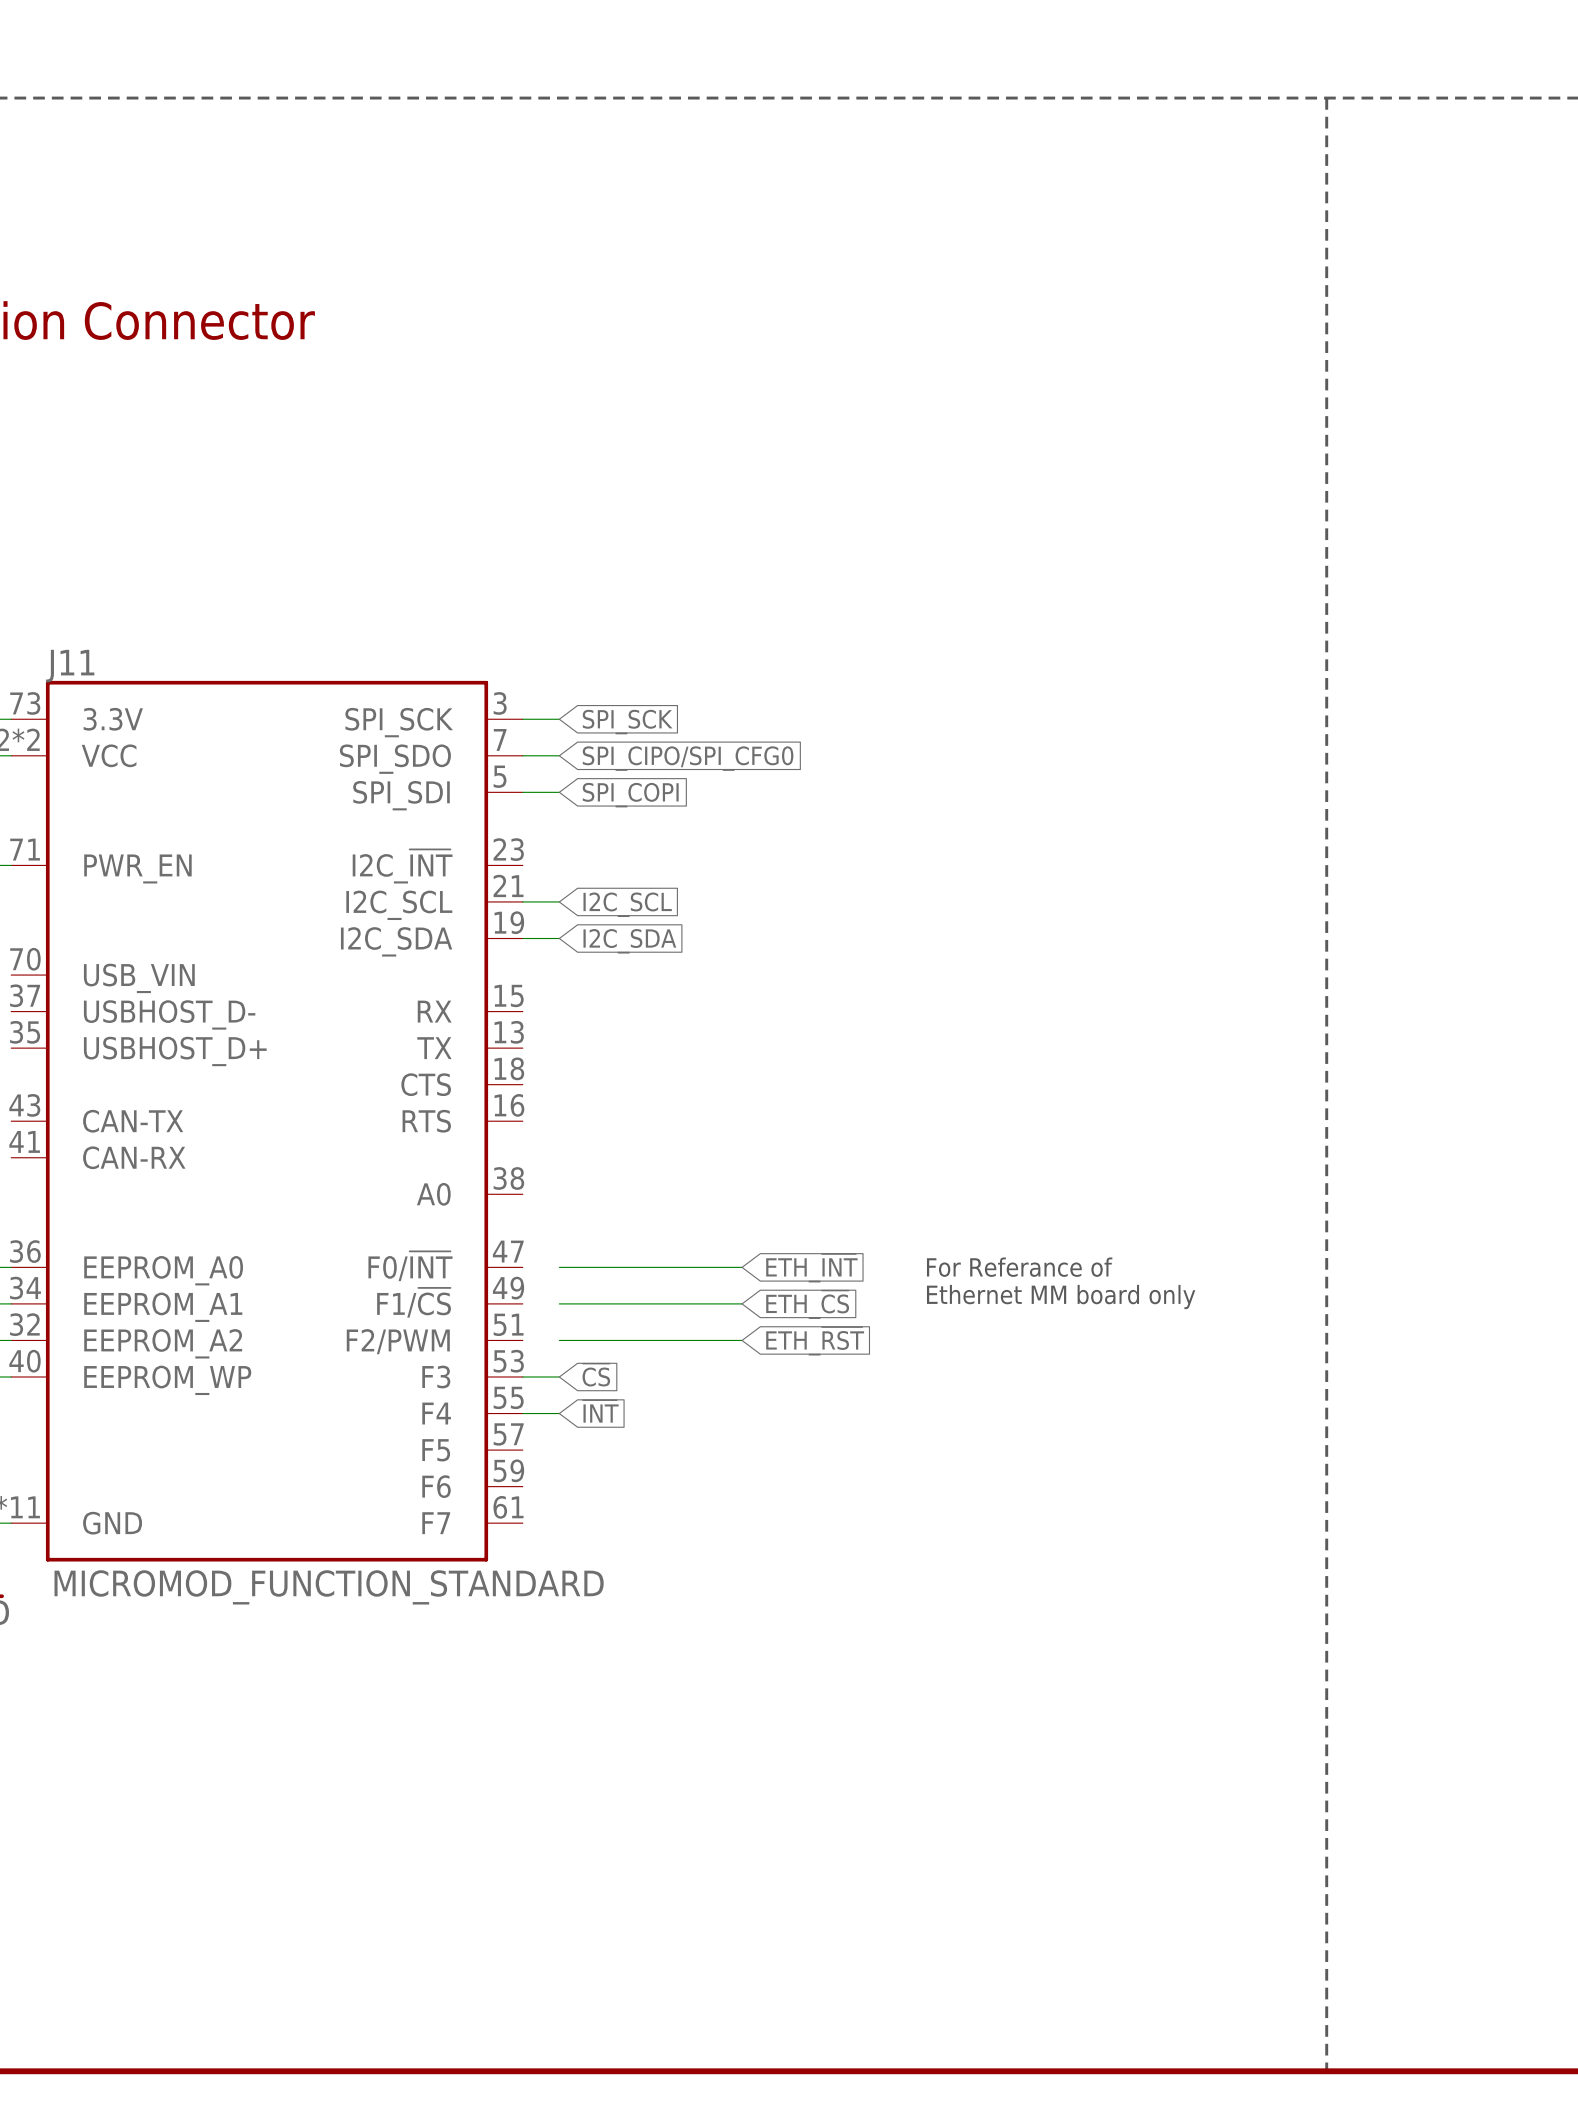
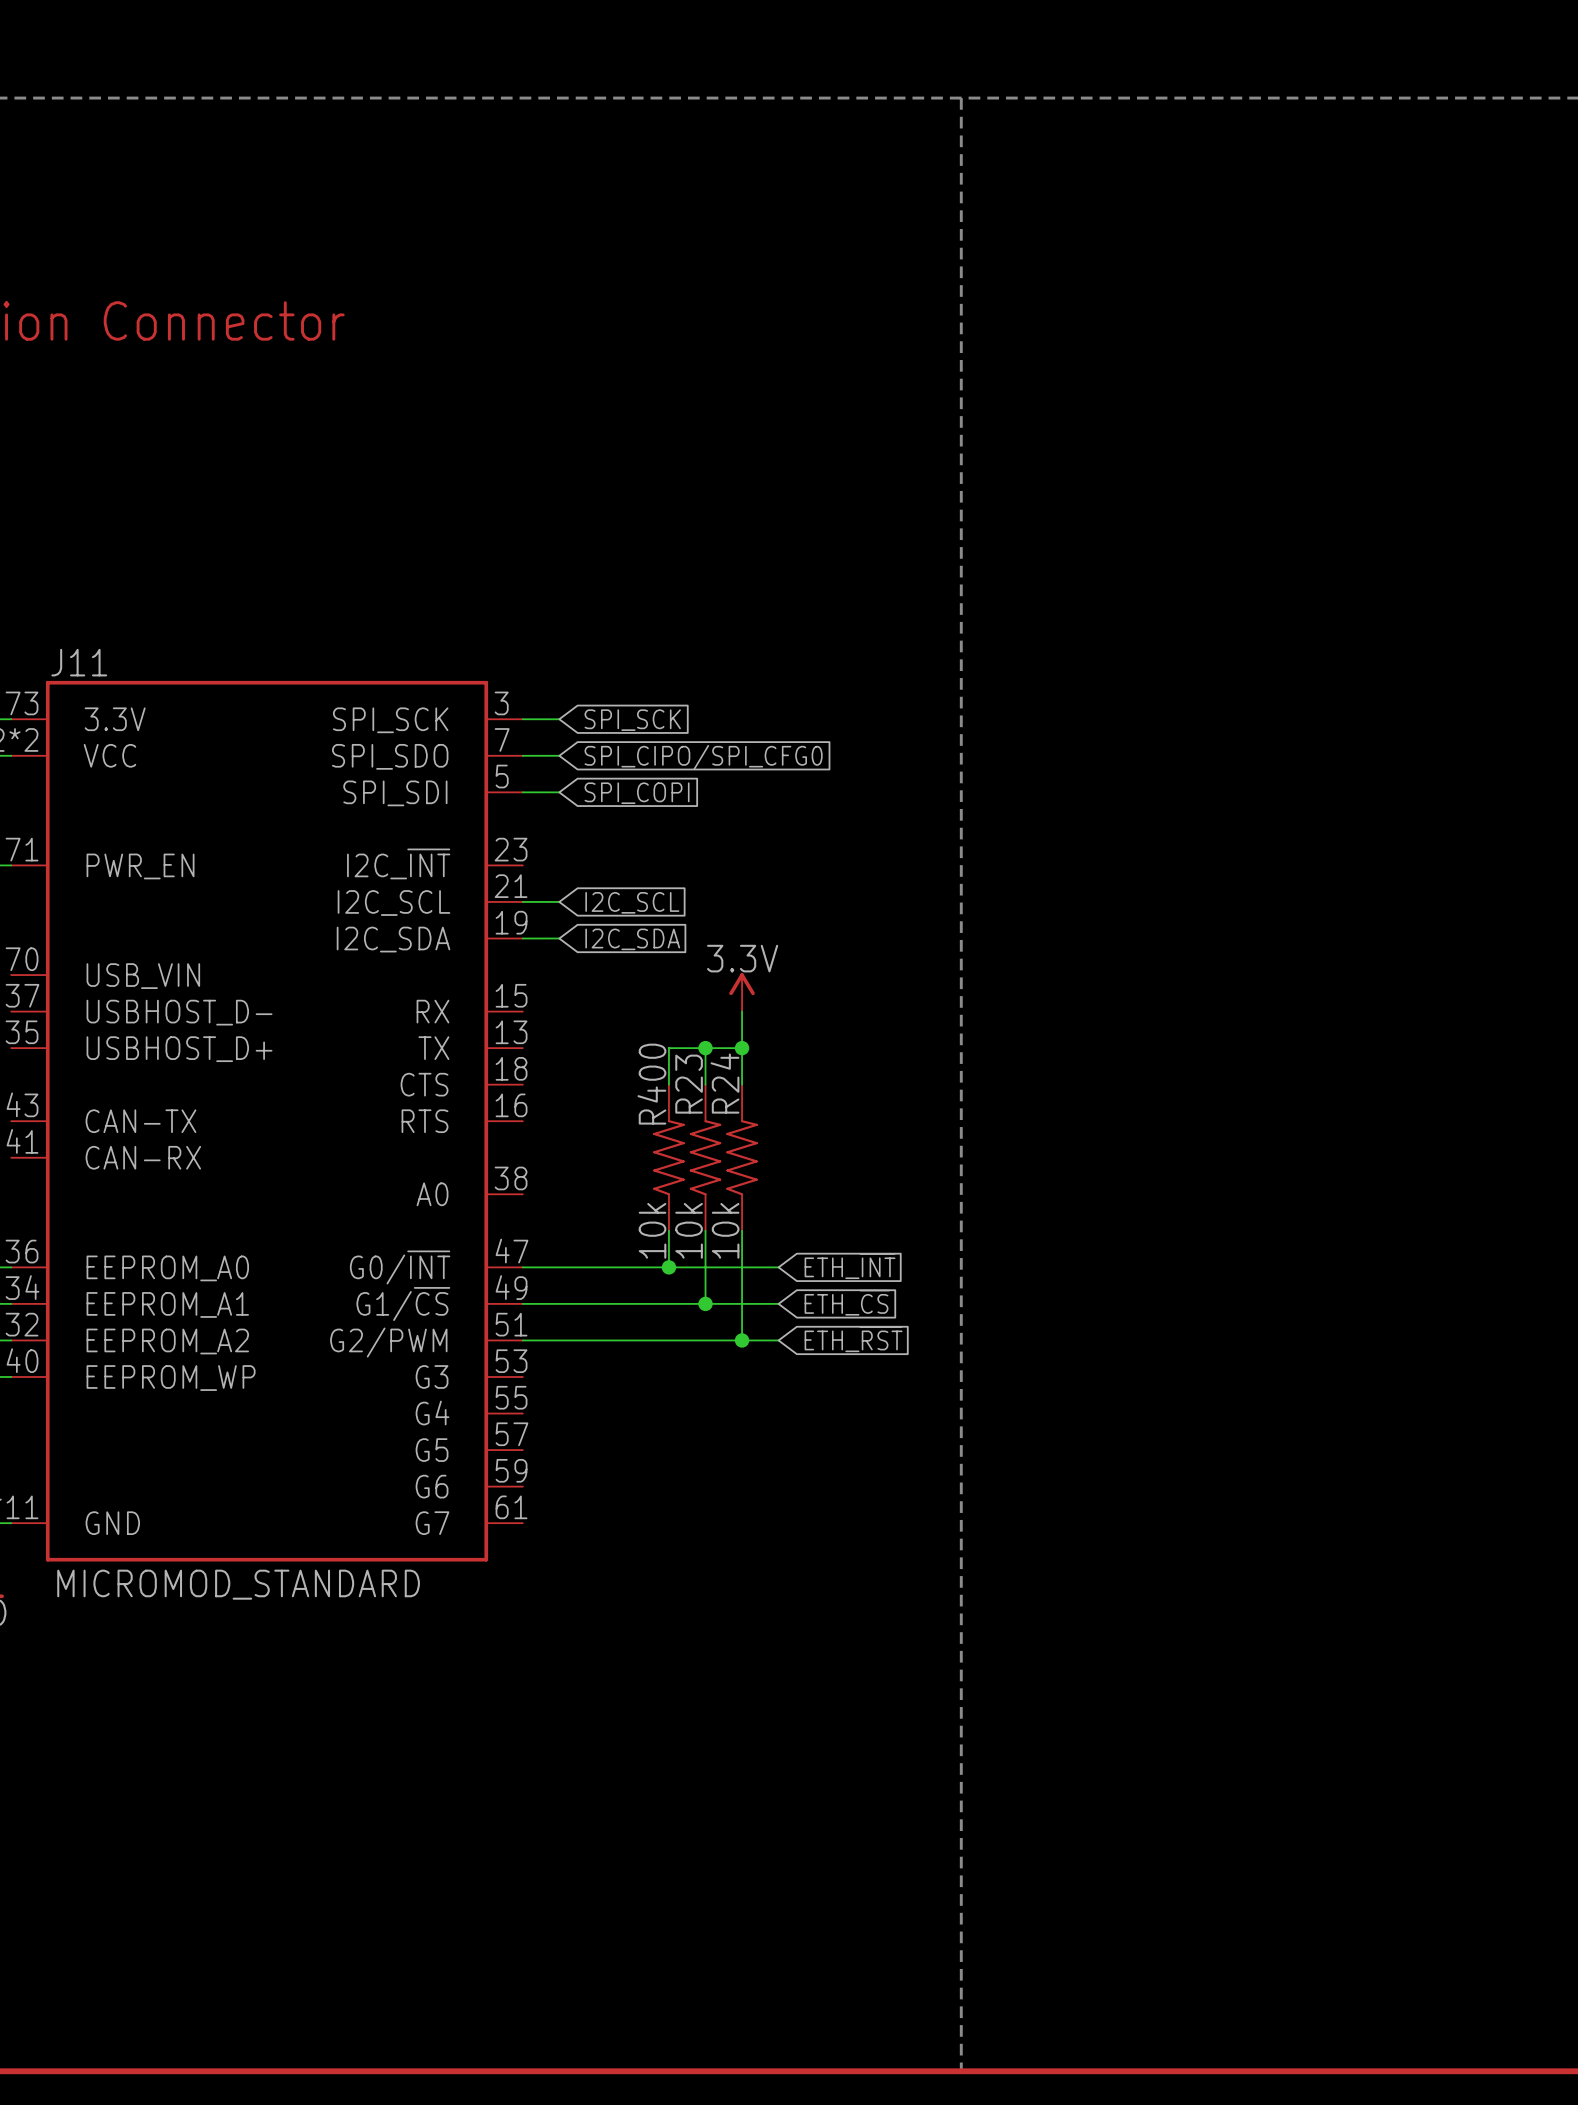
line: none -> (961, 98) (961, 2071)
line: (1326, 98) (1326, 2071) -> none
power symbol: none -> 3.3V (742, 992)
wire: none -> (742, 1011) (742, 1084)
wire: none -> (705, 1048) (705, 1084)
junction: none -> (705, 1048)
wire: none -> (742, 1048) (668, 1048) (668, 1084)
junction: none -> (742, 1048)
R400: none -> 10k (668, 1157)
R23: none -> 10k (705, 1157)
R24: none -> 10k (742, 1157)
wire: none -> (668, 1230) (668, 1267)
wire: none -> (705, 1230) (705, 1303)
wire: none -> (742, 1230) (742, 1340) (778, 1340)
J11 pin name: F0/~{INT} (410, 1266) -> G0/~{INT} (400, 1267)
wire: none -> (522, 1267) (559, 1267)
junction: none -> (668, 1267)
wire: none -> (742, 1267) (778, 1267)
text: For Referance of (1019, 1267) -> none
global label position: ETH_~{INT} (811, 1268) -> ETH_~{INT} (850, 1266)
text: Ethernet MM board only (1061, 1297) -> none
J11 pin name: F1/~{CS} (414, 1302) -> G1/~{CS} (403, 1304)
junction: none -> (705, 1303)
wire: none -> (742, 1303) (778, 1303)
global label position: ETH_~{CS} (807, 1304) -> ETH_~{CS} (847, 1302)
junction: none -> (742, 1340)
J11 pin name: F2/PWM (398, 1341) -> G2/PWM (388, 1342)
global label position: ETH_~{RST} (815, 1341) -> ETH_~{RST} (853, 1339)
global label: ~{CS} (596, 1375) -> none
J11 pin name: F3 (436, 1377) -> G3 (432, 1377)
wire: (522, 1377) (559, 1377) -> (522, 1303) (559, 1303)
global label: ~{INT} (600, 1411) -> none
J11 pin name: F4 (436, 1413) -> G4 (432, 1413)
wire: (522, 1413) (559, 1413) -> (522, 1340) (559, 1340)
J11 pin name: F5 (436, 1450) -> G5 (432, 1450)
J11 pin name: F6 (436, 1486) -> G6 (432, 1486)
J11 pin name: F7 (436, 1523) -> G7 (432, 1523)
J11 value: MICROMOD_FUNCTION_STANDARD (329, 1587) -> MICROMOD_STANDARD (238, 1584)

